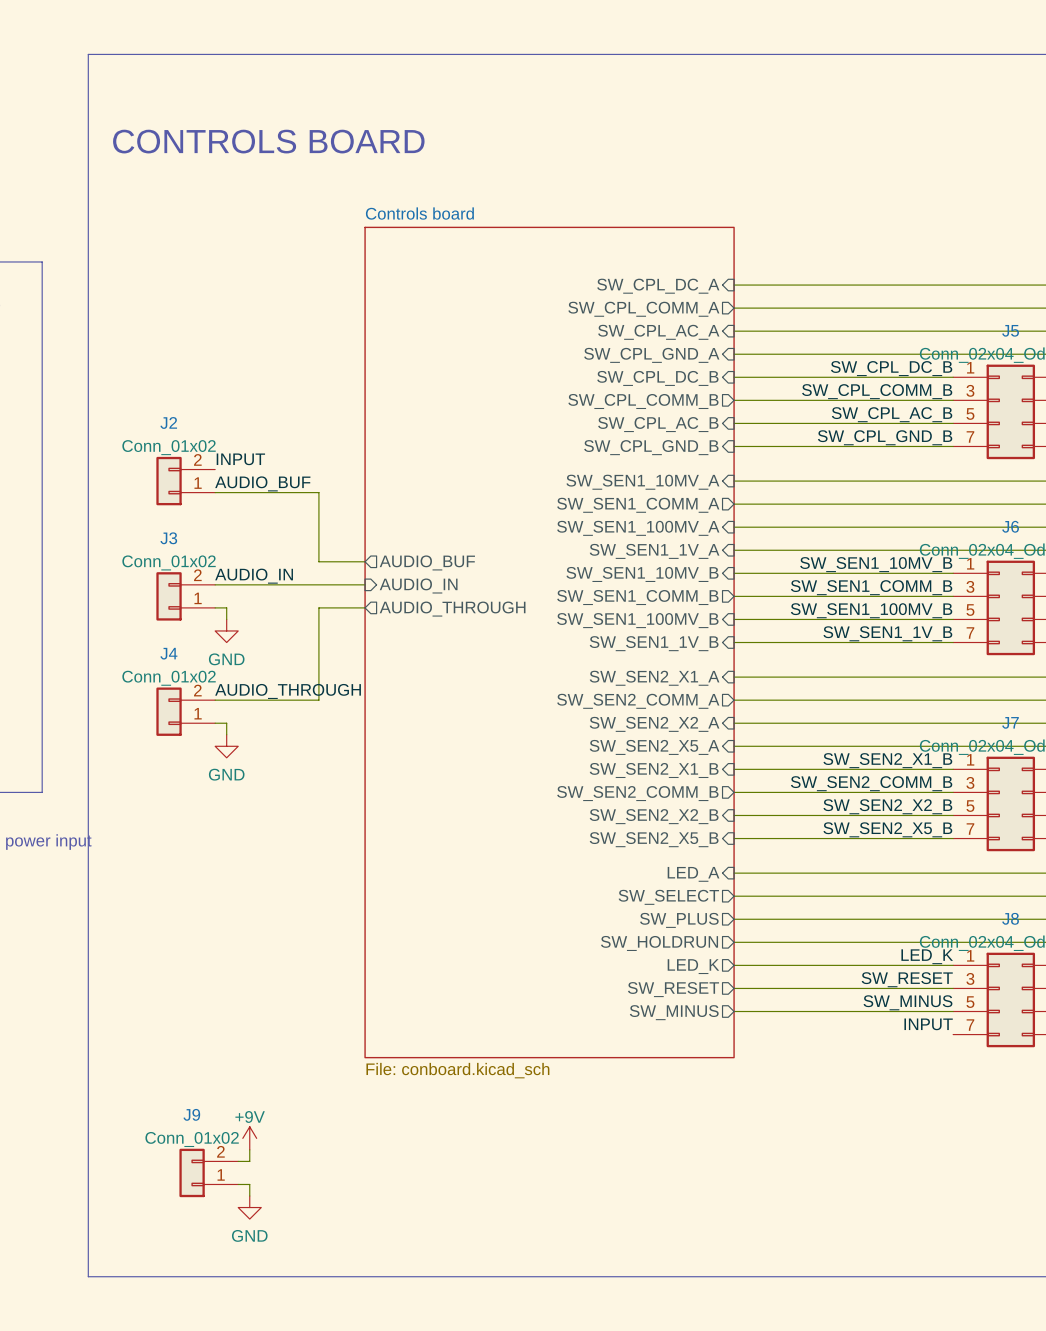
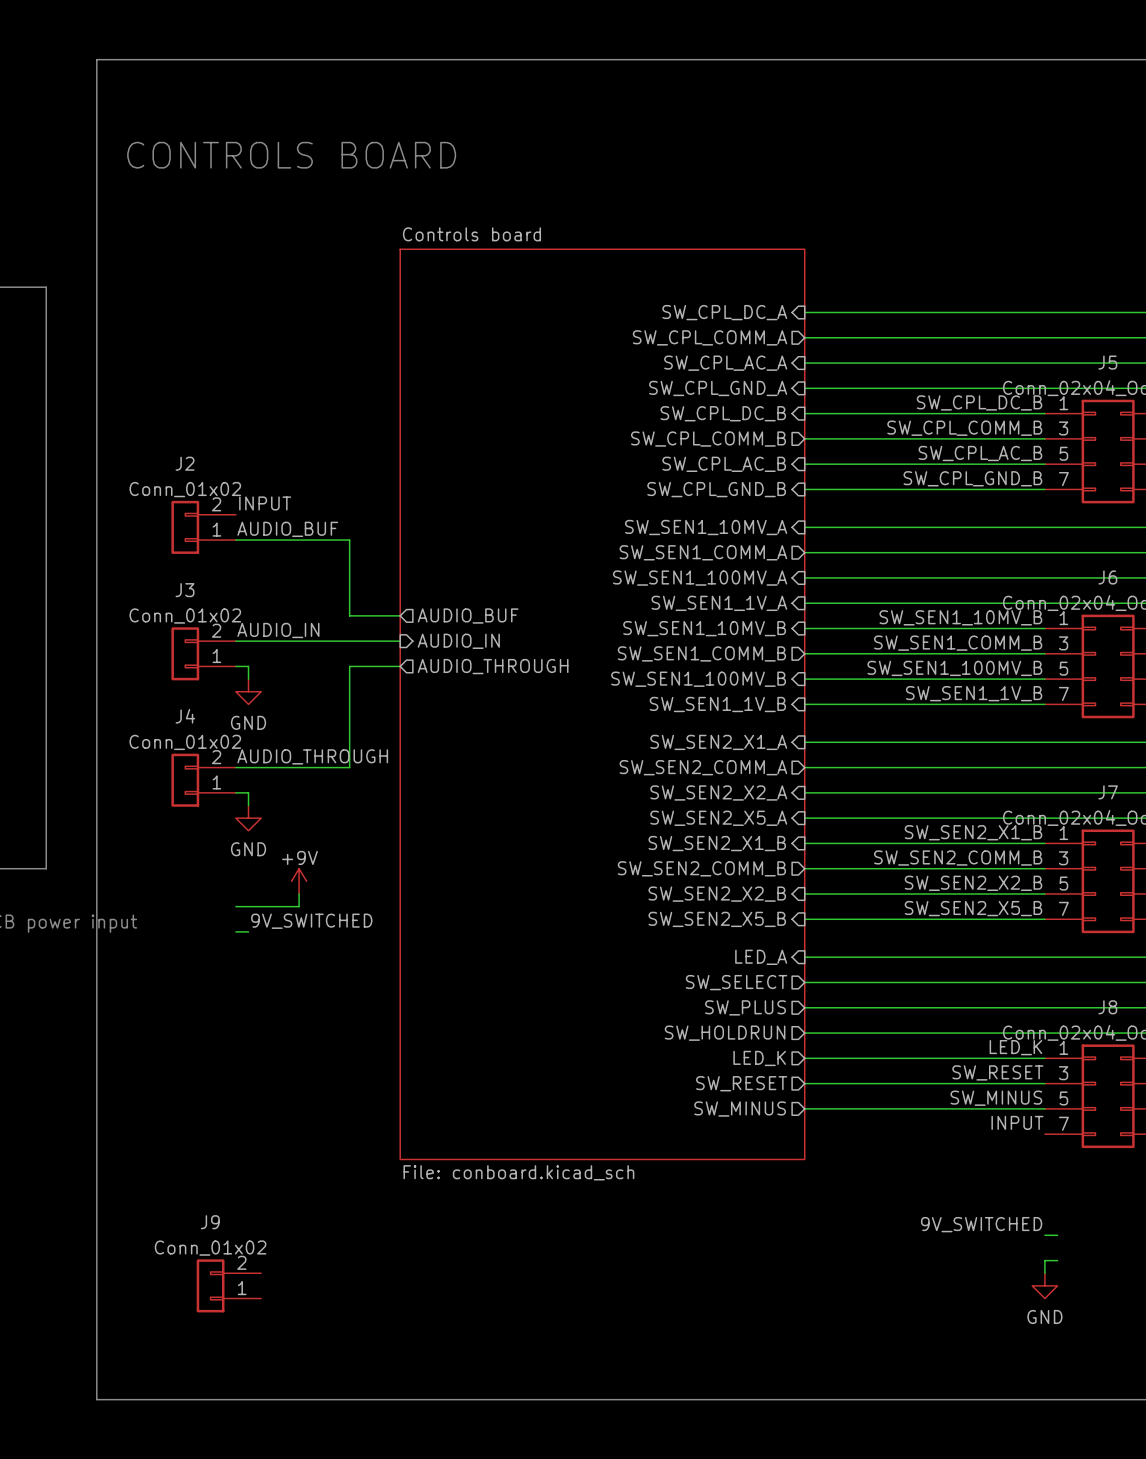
power symbol: none -> +9V (299, 881)
wire: none -> (299, 893) (299, 906) (235, 906)
label: none -> 9V_SWITCHED (311, 921)
wire: none -> (235, 931) (248, 931)
label: none -> 9V_SWITCHED (981, 1224)
wire: none -> (1044, 1235) (1057, 1235)
power symbol: +9V (249, 1138) -> none
wire: (249, 1149) (249, 1161) (238, 1161) -> none
wire: none -> (1057, 1260) (1044, 1260) (1044, 1273)
power symbol: none -> GND (1044, 1285)
wire: (238, 1184) (249, 1184) (249, 1196) -> none
power symbol: GND (249, 1207) -> none

